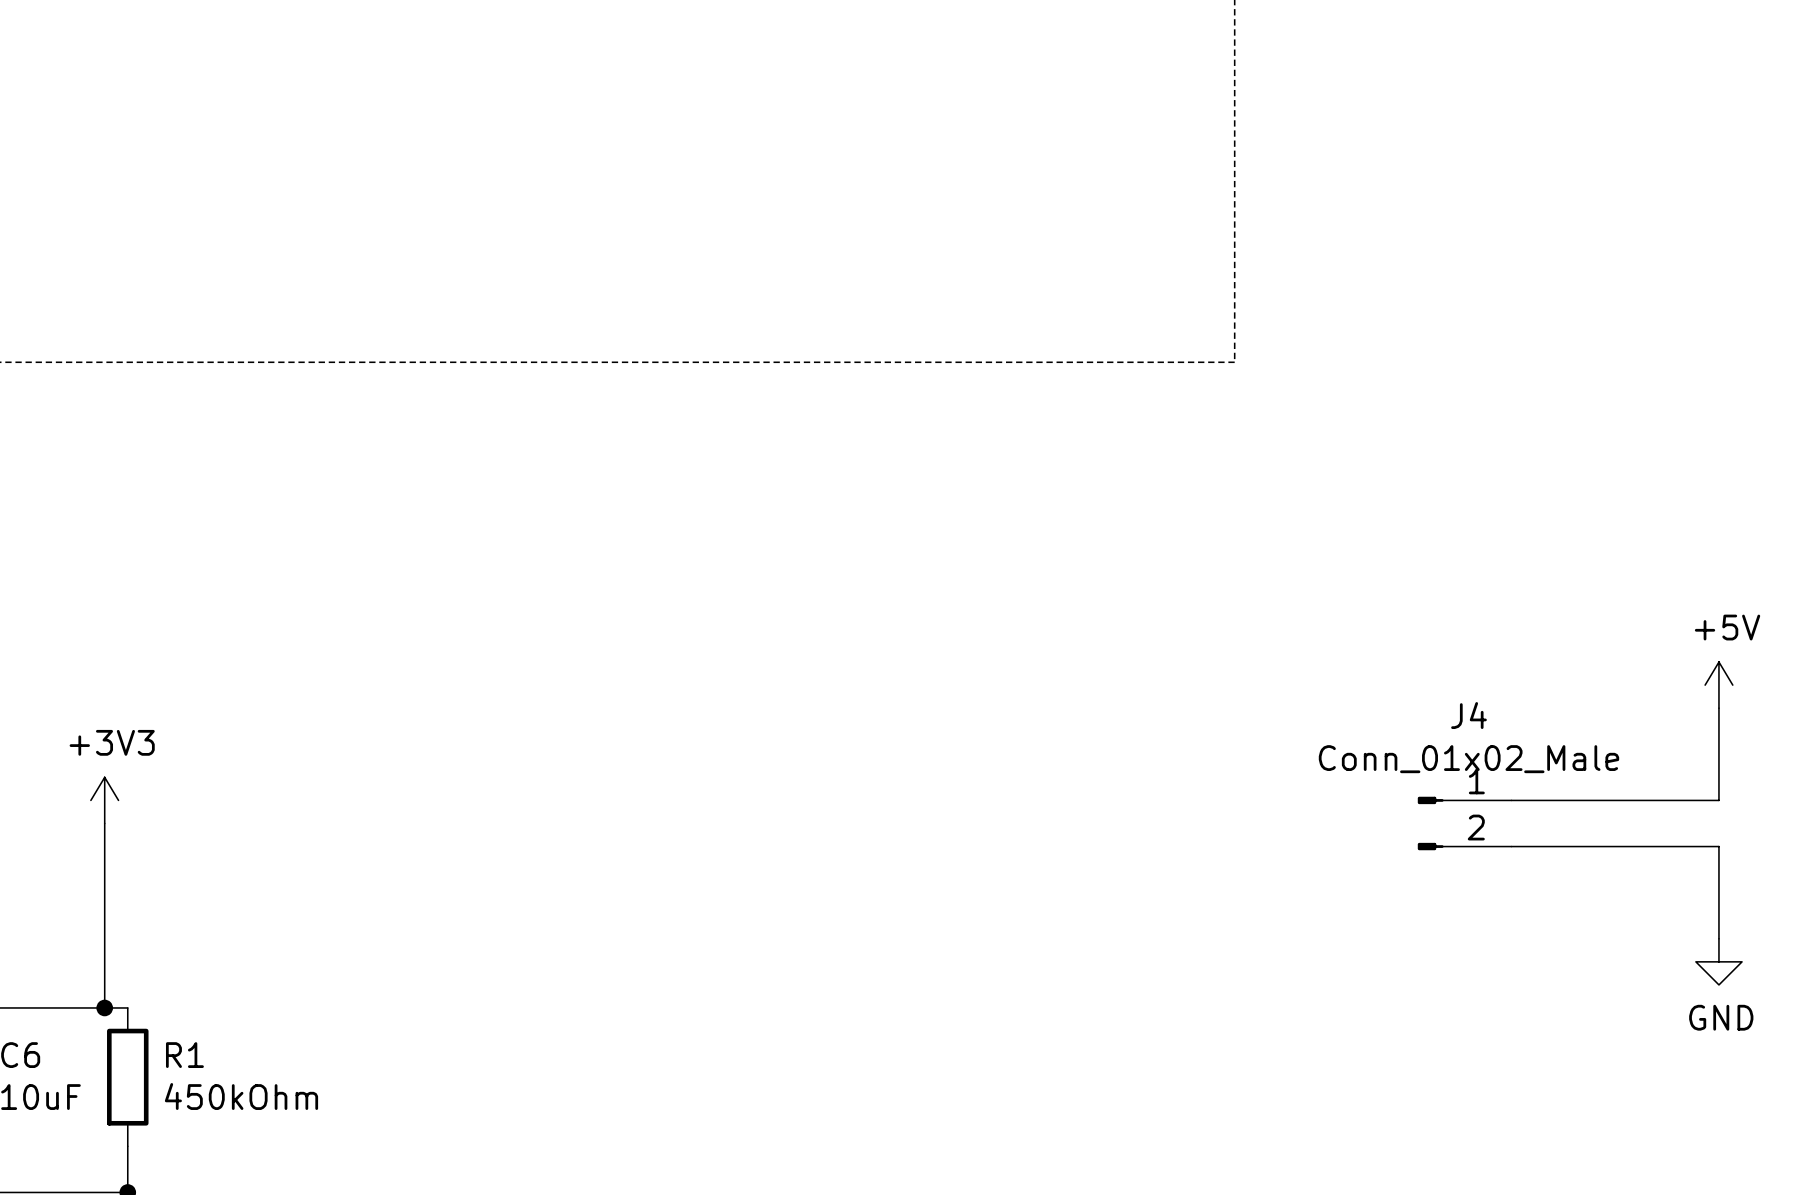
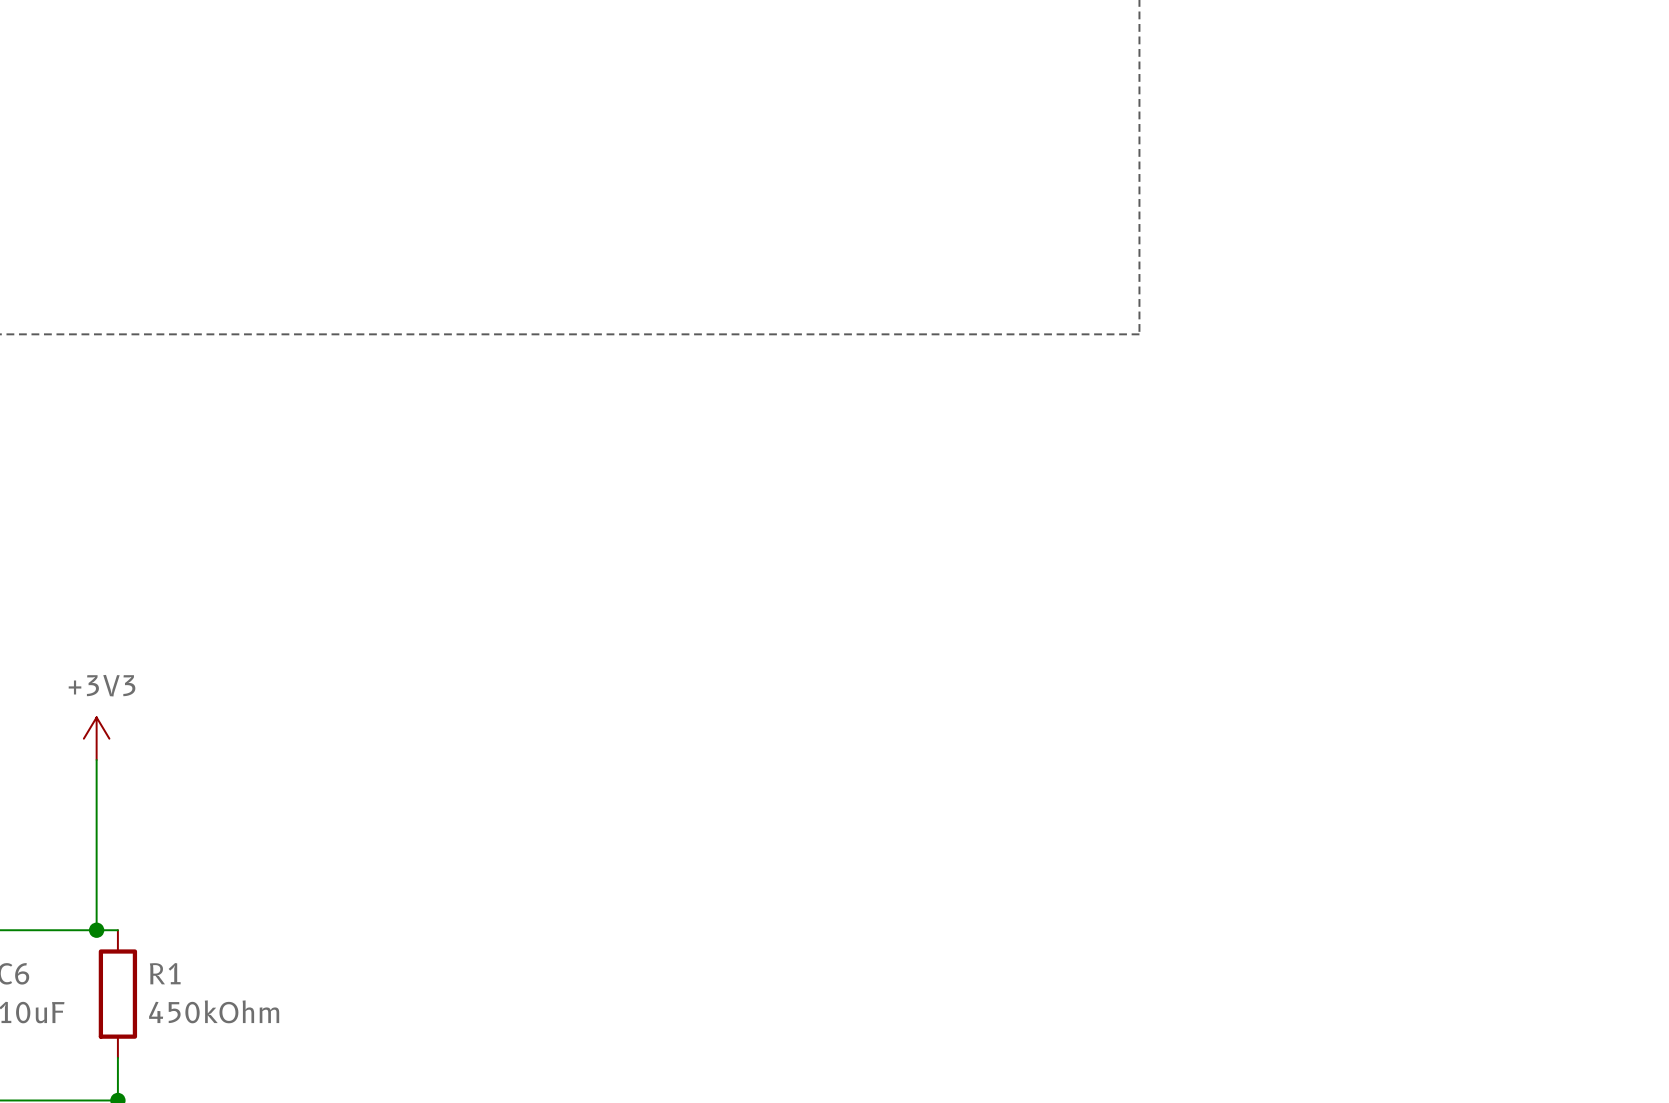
power symbol: +5V (1718, 685) -> none
wire: (1718, 708) (1718, 800) (1511, 800) -> none
J4: Conn_01x02_Male (1464, 823) -> none
wire: (1511, 846) (1718, 846) (1718, 938) -> none
power symbol: GND (1718, 961) -> none

